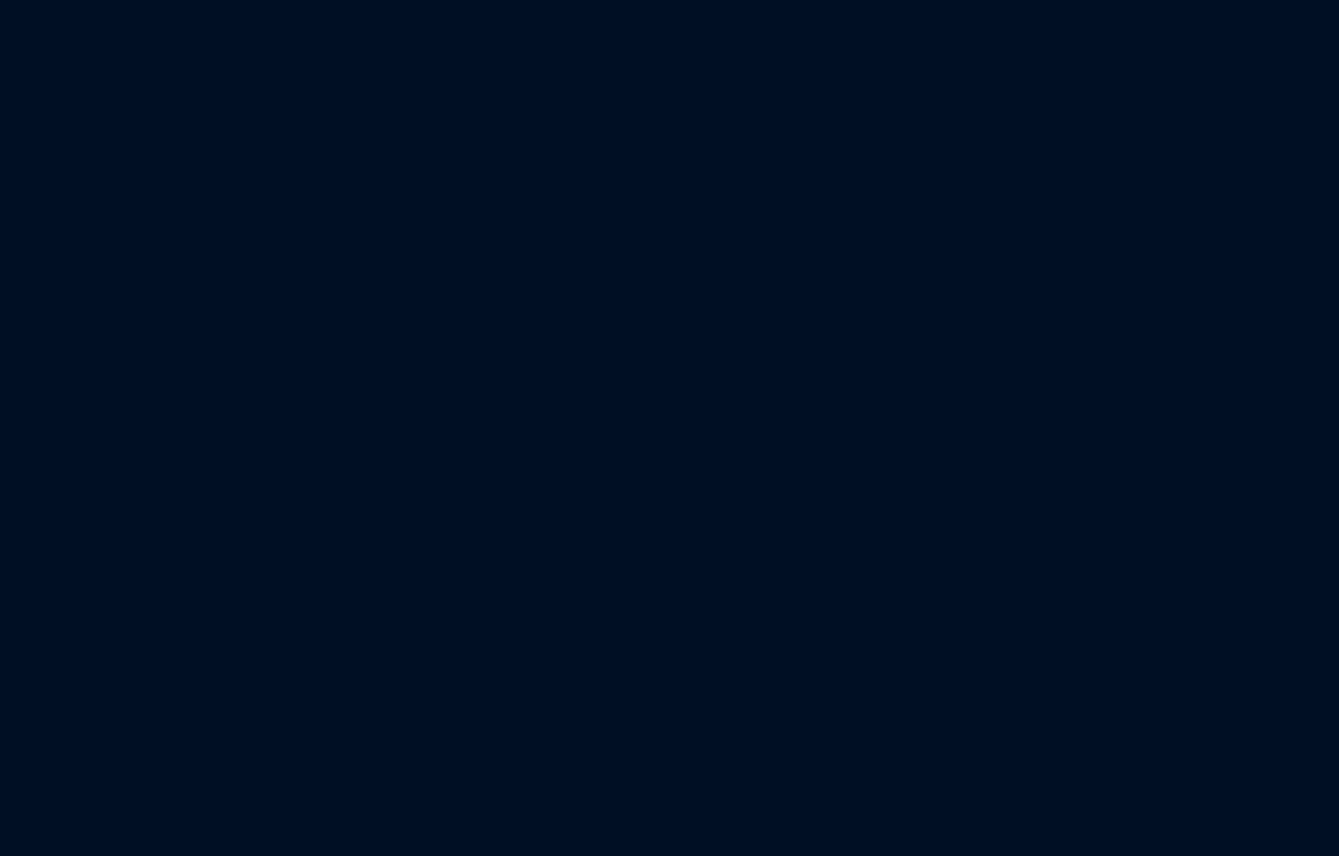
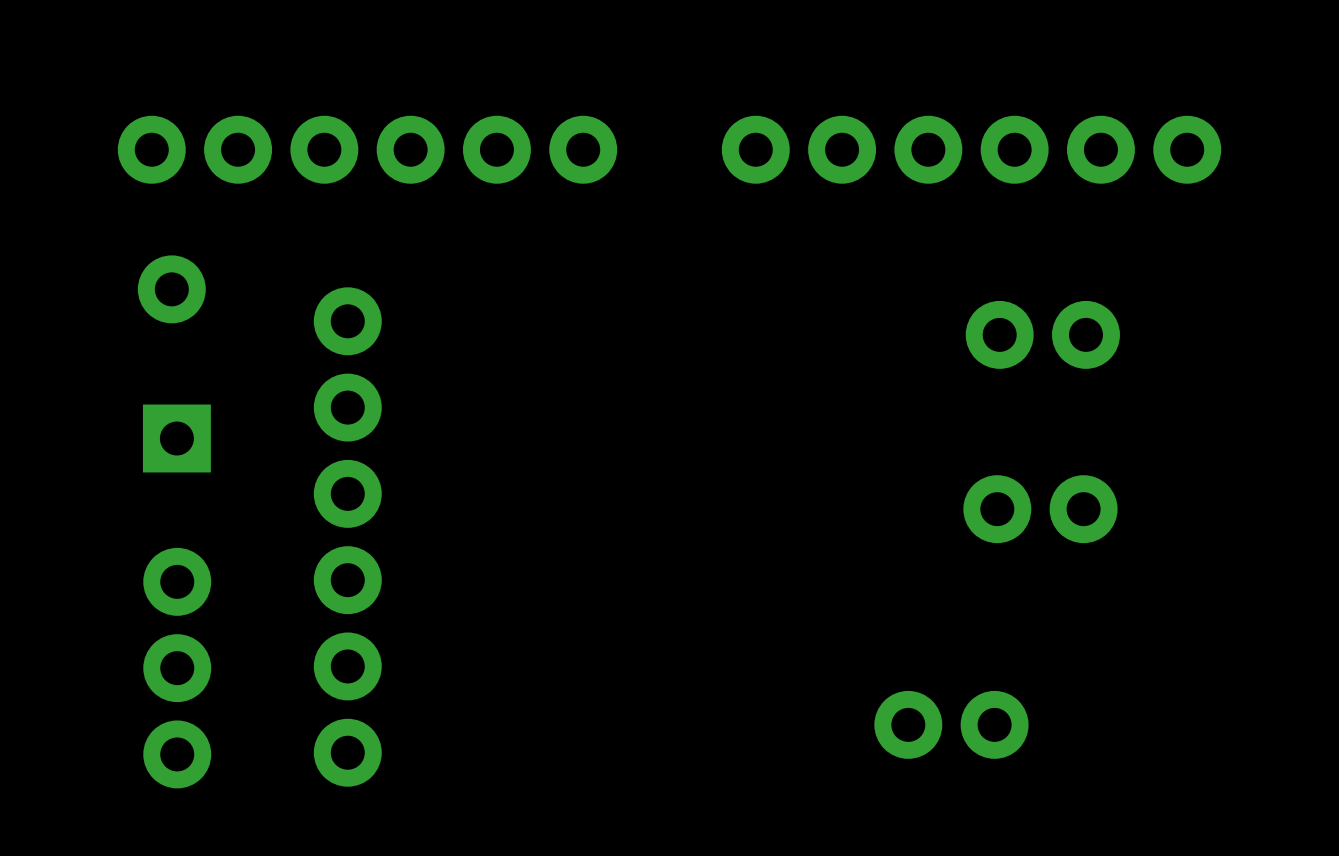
part: none -> (367, 149)
part: none -> (971, 149)
part: none -> (171, 289)
part: none -> (1042, 334)
part: none -> (176, 438)
part: none -> (1040, 509)
part: none -> (347, 537)
part: none -> (177, 668)
part: none -> (951, 724)

